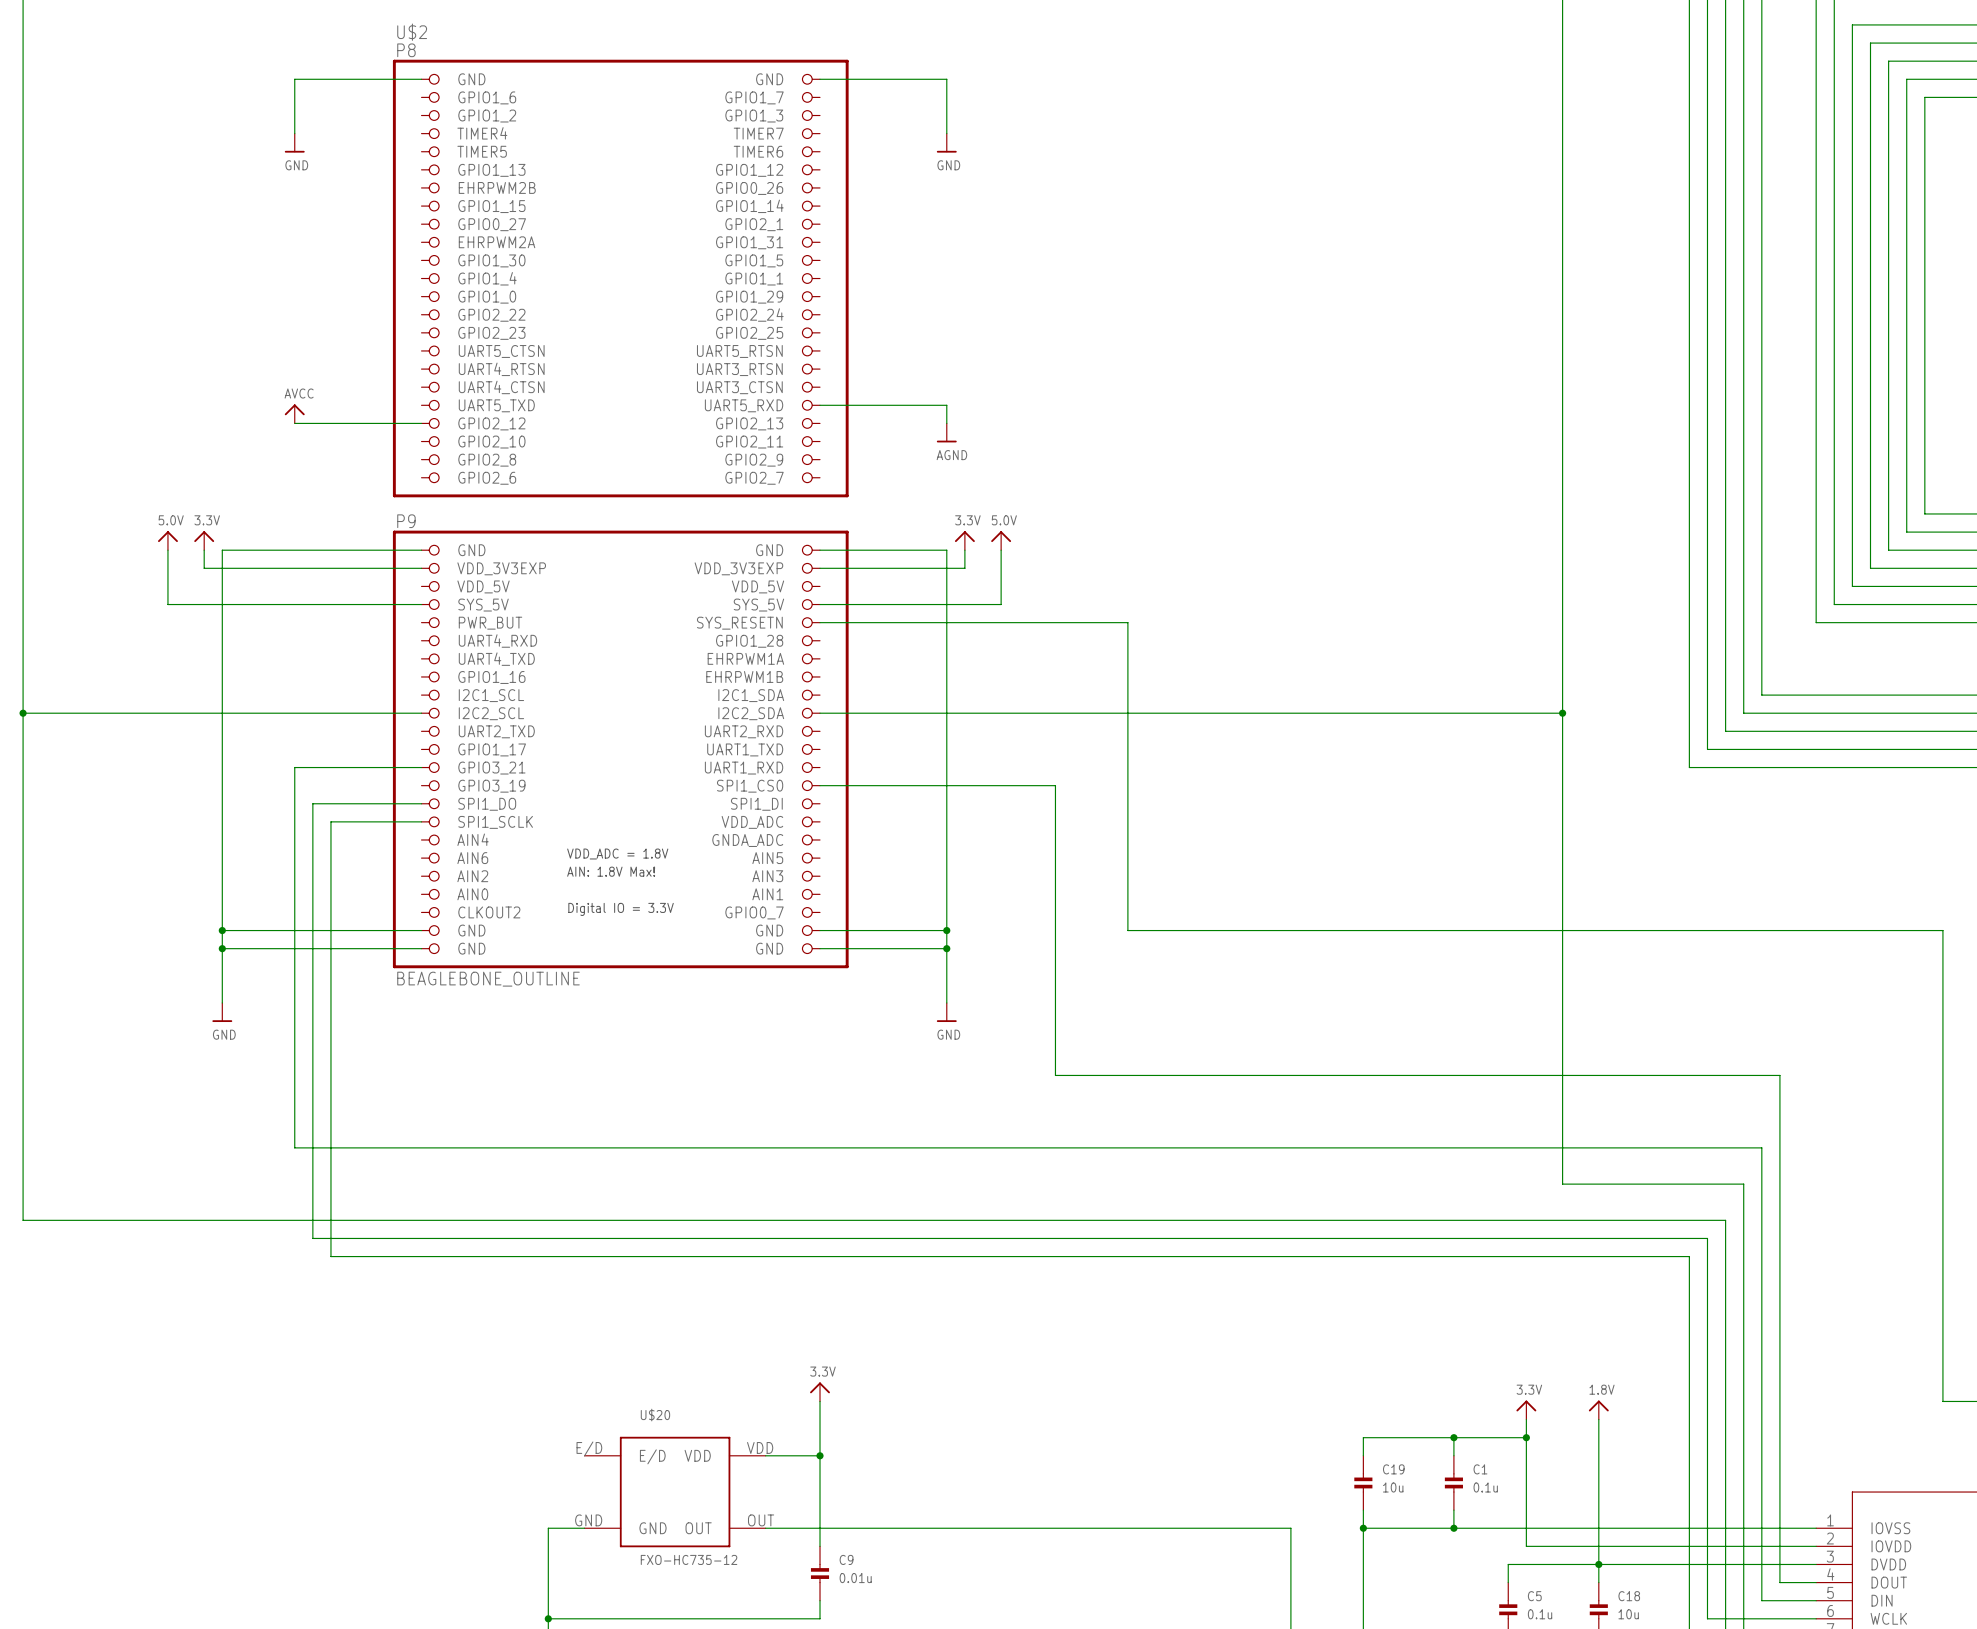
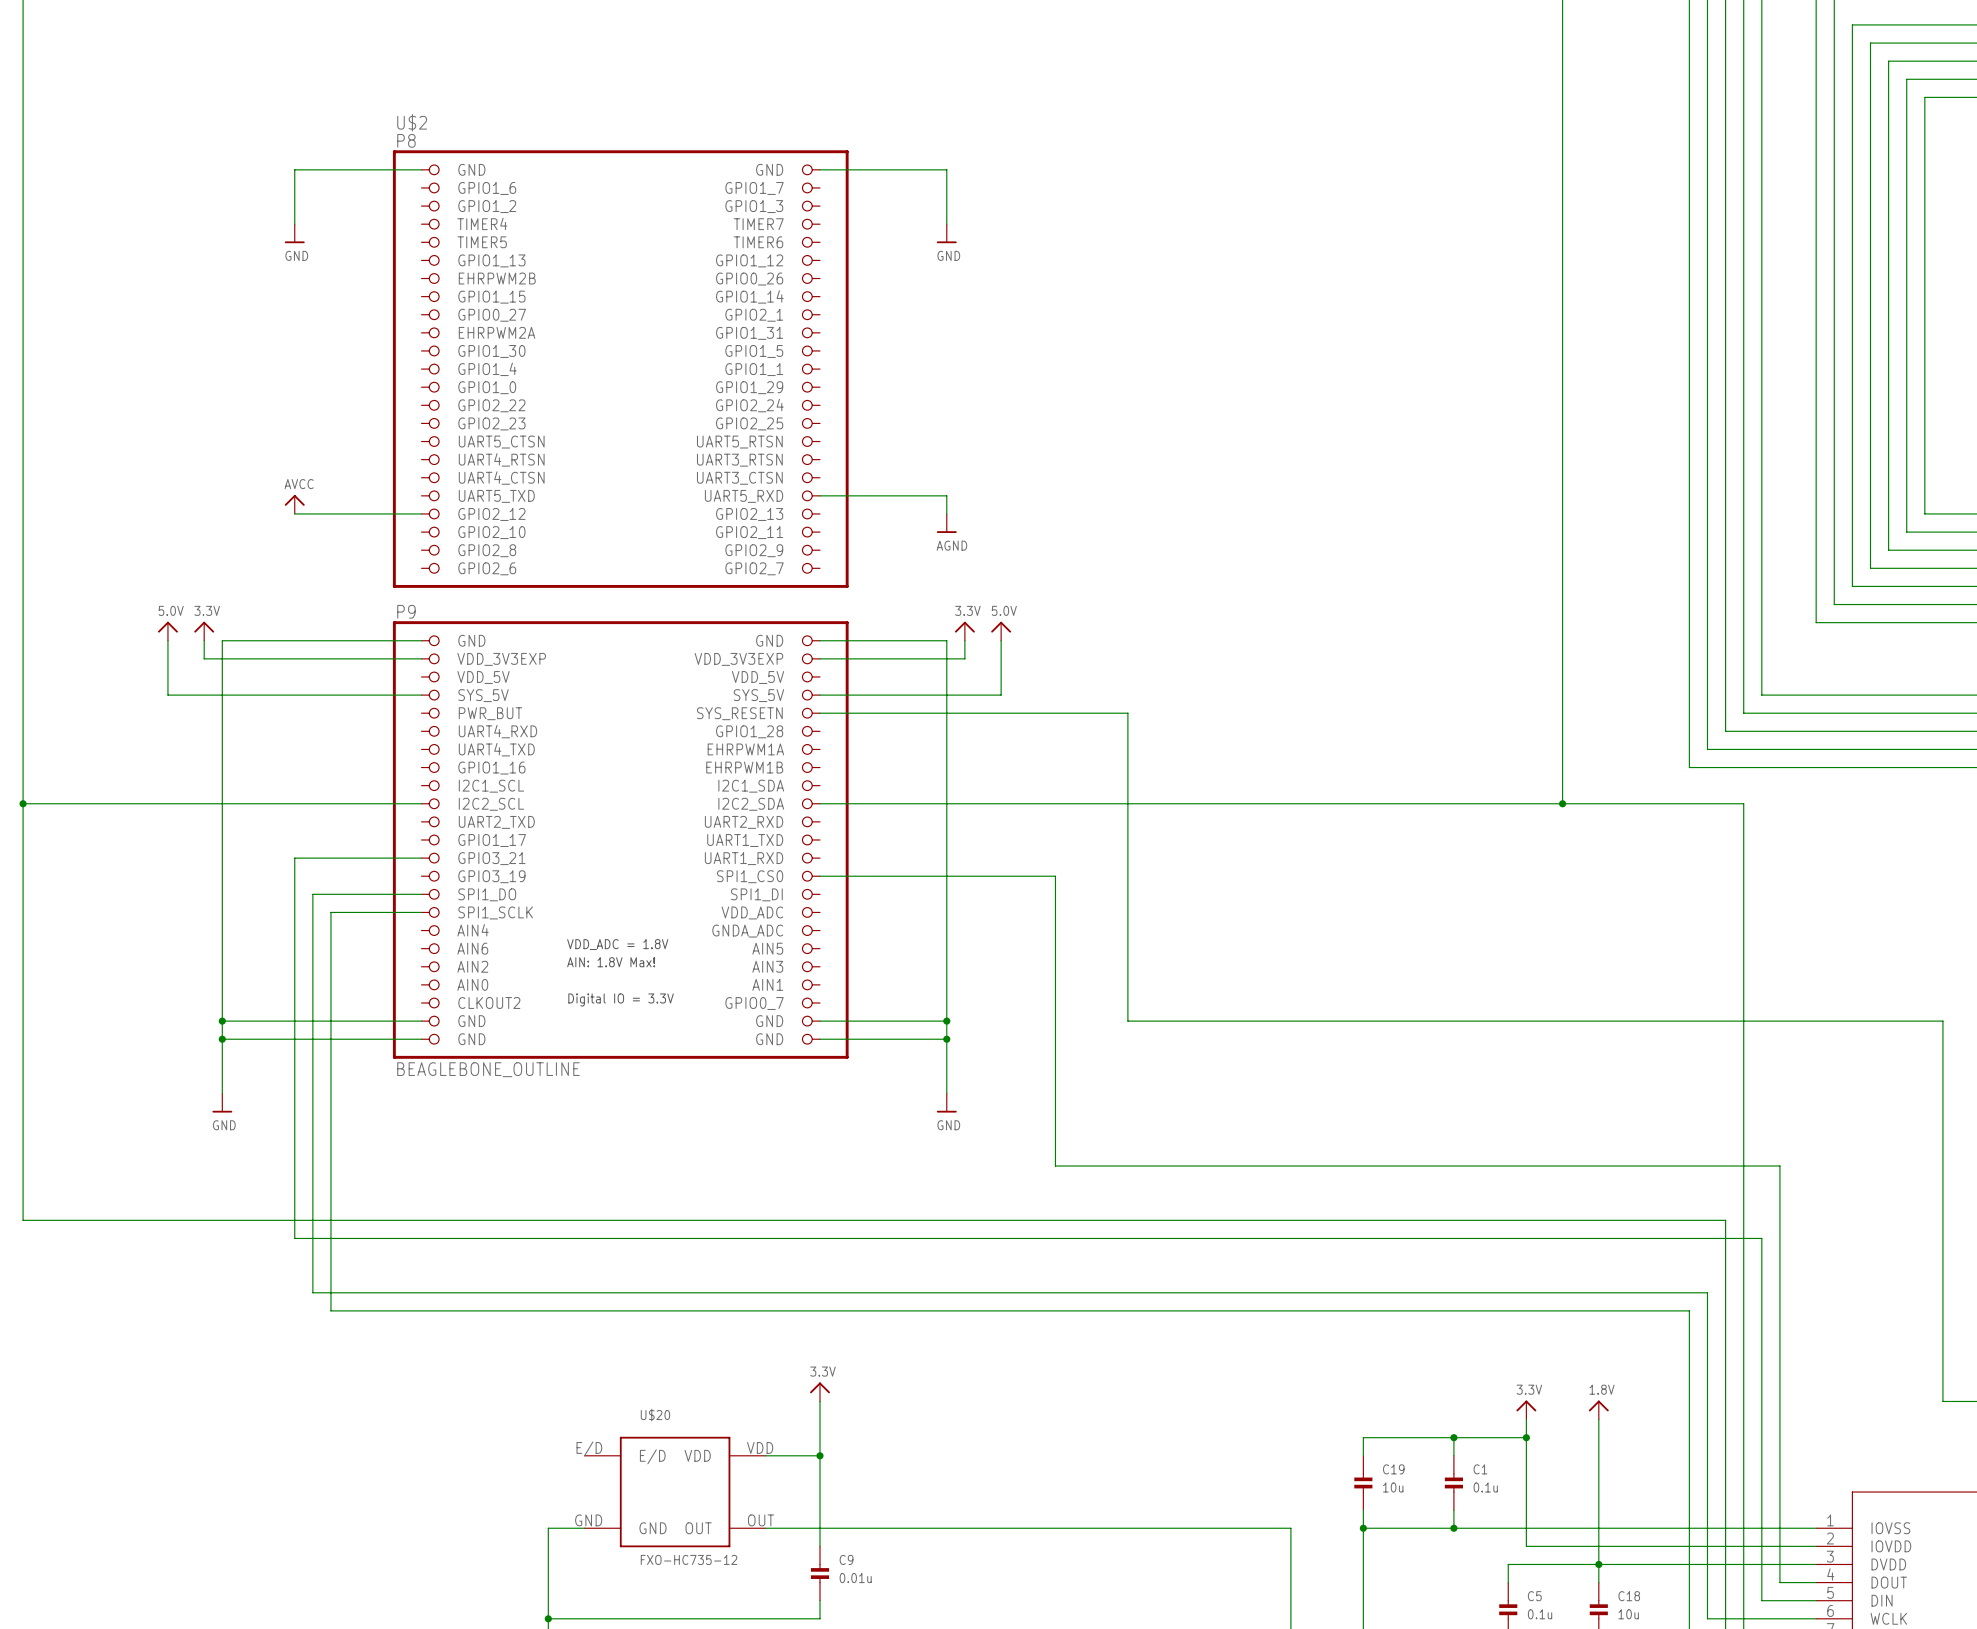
wire: (421, 79) (294, 79) (294, 133) -> (421, 169) (294, 169) (294, 224)
wire: (820, 79) (946, 79) (946, 133) -> (820, 169) (946, 169) (946, 224)
power symbol position: GND (294, 143) -> GND (294, 233)
power symbol position: GND (946, 143) -> GND (946, 233)
wire: (820, 405) (946, 405) (946, 423) -> (820, 495) (946, 495) (946, 513)
power symbol position: AVCC (294, 413) -> AVCC (294, 504)
wire: (294, 423) (421, 423) -> (294, 513) (421, 513)
power symbol position: AGND (946, 432) -> AGND (946, 523)
U$2 position: (620, 513) -> (620, 604)
power symbol position: 5.0V (167, 540) -> 5.0V (167, 631)
power symbol position: 3.3V (204, 540) -> 3.3V (204, 631)
power symbol position: 3.3V (964, 540) -> 3.3V (964, 631)
power symbol position: 5.0V (1001, 540) -> 5.0V (1001, 631)
wire: (167, 550) (167, 604) (421, 604) -> (167, 640) (167, 695) (421, 695)
wire: (204, 550) (204, 568) (421, 568) -> (204, 640) (204, 658) (421, 658)
wire: (421, 550) (222, 550) (222, 640) -> (421, 640) (222, 640)
wire: (820, 550) (946, 550) (946, 640) -> (820, 640) (946, 640)
wire: (964, 550) (964, 568) (820, 568) -> (964, 640) (964, 658) (820, 658)
wire: (1001, 550) (1001, 604) (820, 604) -> (1001, 640) (1001, 695) (820, 695)
wire: (820, 622) (1127, 622) (1127, 713) (1562, 713) -> none
wire: (23, 713) (421, 713) -> none
junction: (23, 713) -> none
junction: (1562, 713) -> none
wire: (421, 767) (294, 767) (294, 858) -> (421, 858) (294, 858)
wire: (820, 785) (1055, 785) (1055, 876) -> (820, 876) (1055, 876)
wire: none -> (23, 803) (312, 803)
junction: none -> (23, 803)
wire: (312, 803) (312, 894) -> (421, 894) (312, 894)
wire: (1562, 803) (1562, 1184) (1743, 1184) -> (820, 803) (1743, 803) (1743, 1184)
junction: none -> (1562, 803)
wire: (421, 821) (330, 821) (330, 912) -> (421, 912) (330, 912)
wire: (222, 930) (421, 930) -> (222, 1021) (421, 1021)
junction: (222, 930) -> none
wire: (820, 930) (946, 930) -> (820, 1021) (946, 1021)
junction: (946, 930) -> none
wire: (1127, 930) (1942, 930) (1942, 1021) -> (1127, 930) (1127, 1021) (1942, 1021)
wire: (222, 948) (421, 948) -> (222, 1039) (421, 1039)
junction: (222, 948) -> none
wire: (820, 948) (946, 948) -> (820, 1039) (946, 1039)
junction: (946, 948) -> none
wire: none -> (222, 1003) (222, 1093)
wire: none -> (946, 1003) (946, 1093)
power symbol position: GND (222, 1012) -> GND (222, 1103)
power symbol position: GND (946, 1012) -> GND (946, 1103)
junction: none -> (222, 1021)
junction: none -> (946, 1021)
junction: none -> (222, 1039)
junction: none -> (946, 1039)
wire: (1055, 1075) (1779, 1075) (1779, 1166) -> (1055, 1075) (1055, 1166) (1779, 1166)
wire: (294, 1147) (1761, 1147) (1761, 1238) -> (294, 1147) (294, 1238) (312, 1238) (312, 1292) (1707, 1292)
wire: (1707, 1238) (1707, 1292) -> (1707, 1238) (1761, 1238)
wire: (330, 1256) (1689, 1256) (1689, 1310) -> (330, 1256) (330, 1310) (1689, 1310)

